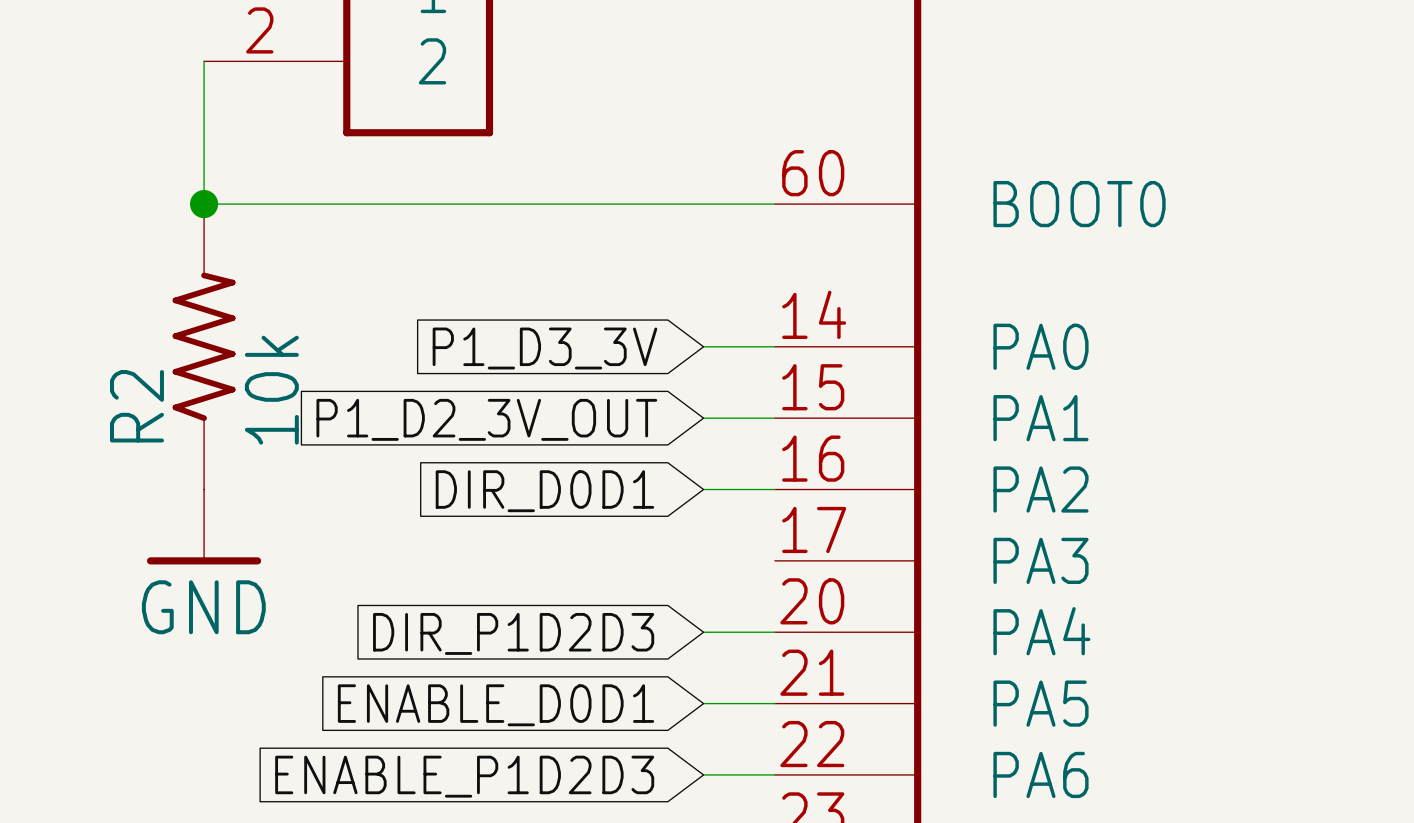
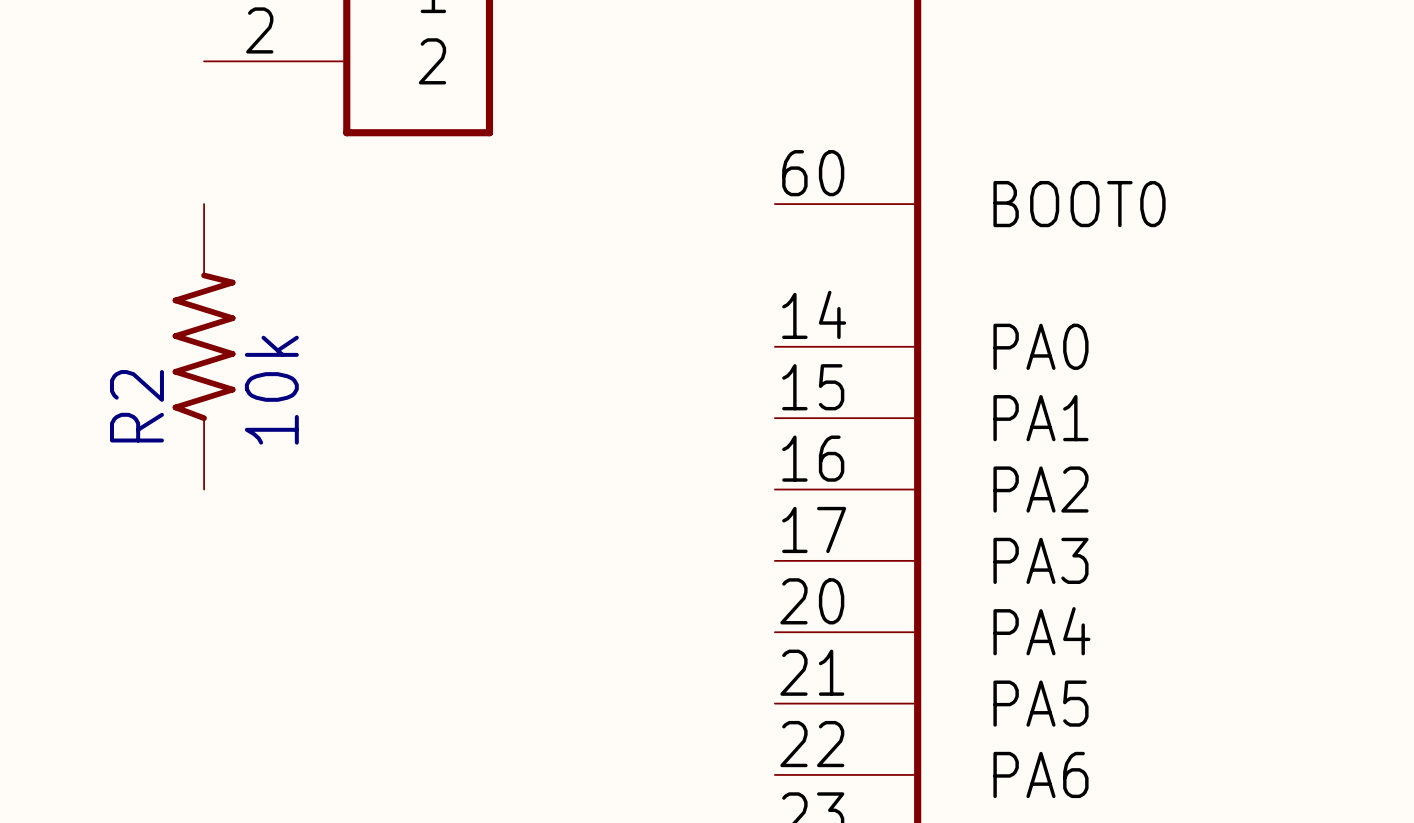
wire: (204, 61) (204, 204) (774, 204) -> none
junction: (204, 204) -> none
wire: (703, 346) (774, 346) -> none
global label: P1_D3_3V (544, 348) -> none
wire: (703, 418) (774, 418) -> none
global label: P1_D2_3V_OUT (486, 419) -> none
wire: (703, 489) (774, 489) -> none
global label: DIR_D0D1 (544, 491) -> none
power symbol: GND (204, 526) -> none
wire: (703, 632) (774, 632) -> none
global label: DIR_P1D2D3 (513, 633) -> none
wire: (703, 703) (774, 703) -> none
global label: ENABLE_D0D1 (496, 705) -> none
wire: (703, 774) (774, 774) -> none
global label: ENABLE_P1D2D3 (464, 776) -> none

